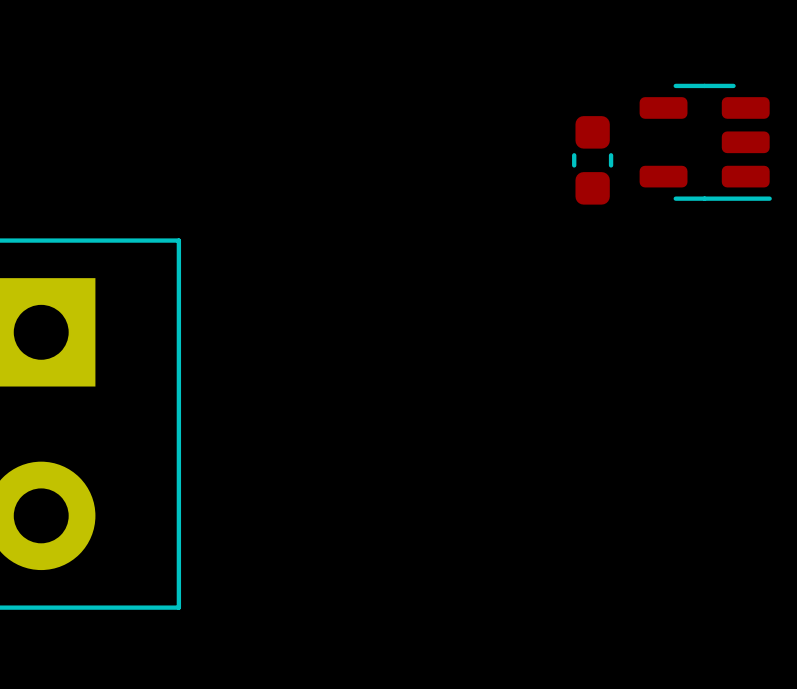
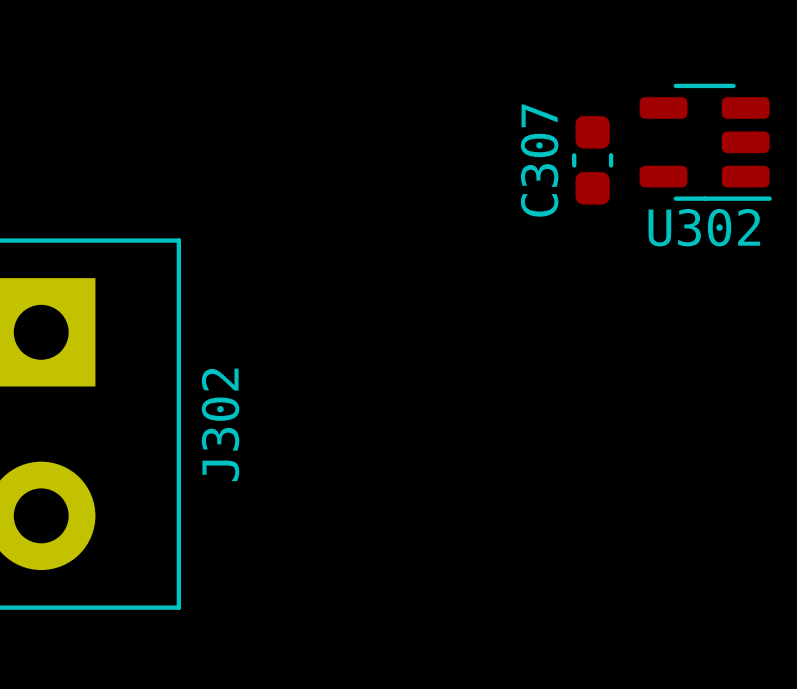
C307 name: none -> C307 (539, 160)
U302 name: none -> U302 (704, 227)
J302 name: none -> J302 (220, 424)

